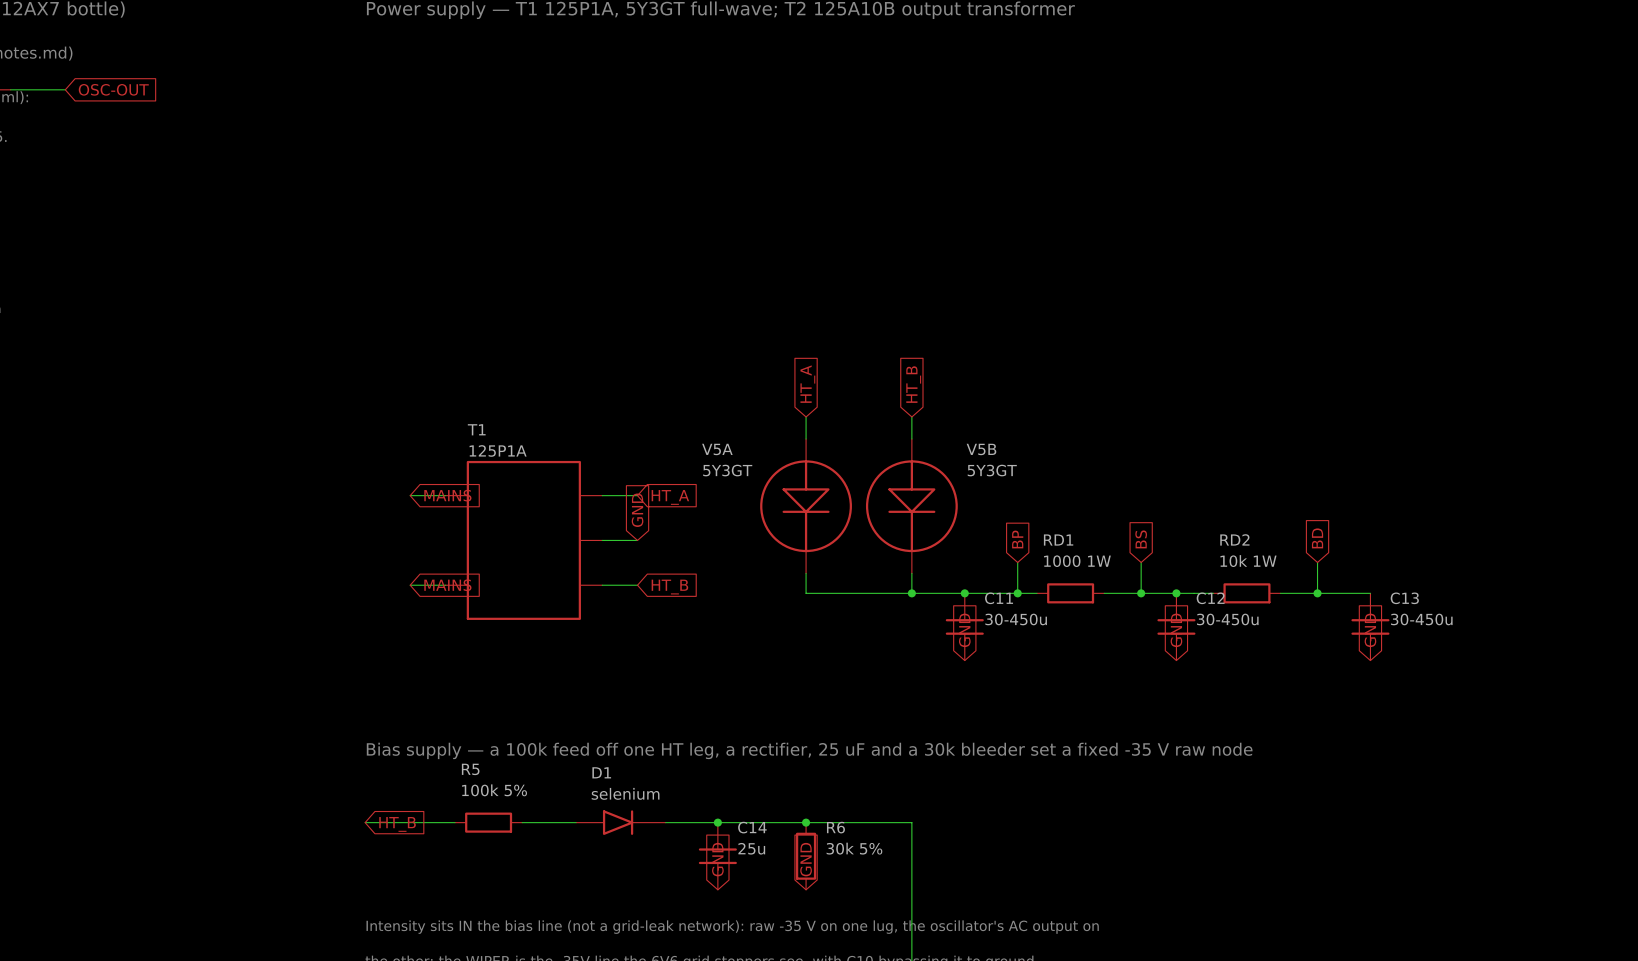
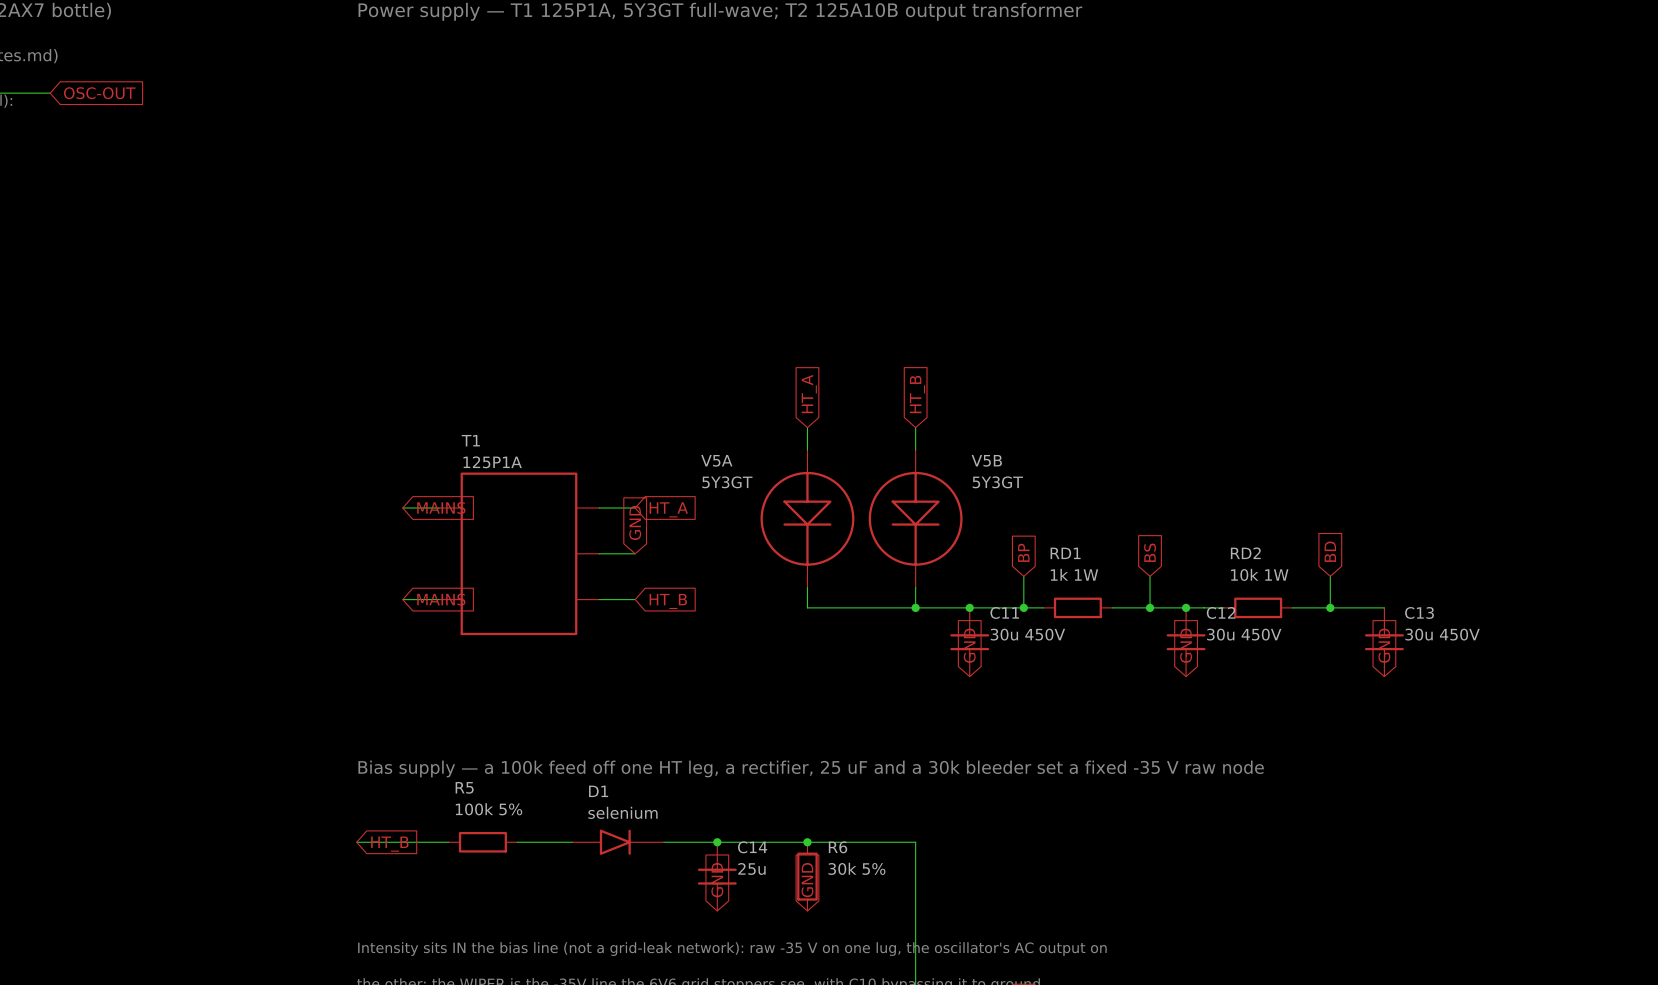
RD1 value: 1000 1W (1077, 561) -> 1k 1W (1074, 574)
C11 value: 30-450u (1016, 619) -> 30u 450V (1027, 634)
C12 value: 30-450u (1227, 619) -> 30u 450V (1244, 634)
C13 value: 30-450u (1421, 619) -> 30u 450V (1442, 634)

